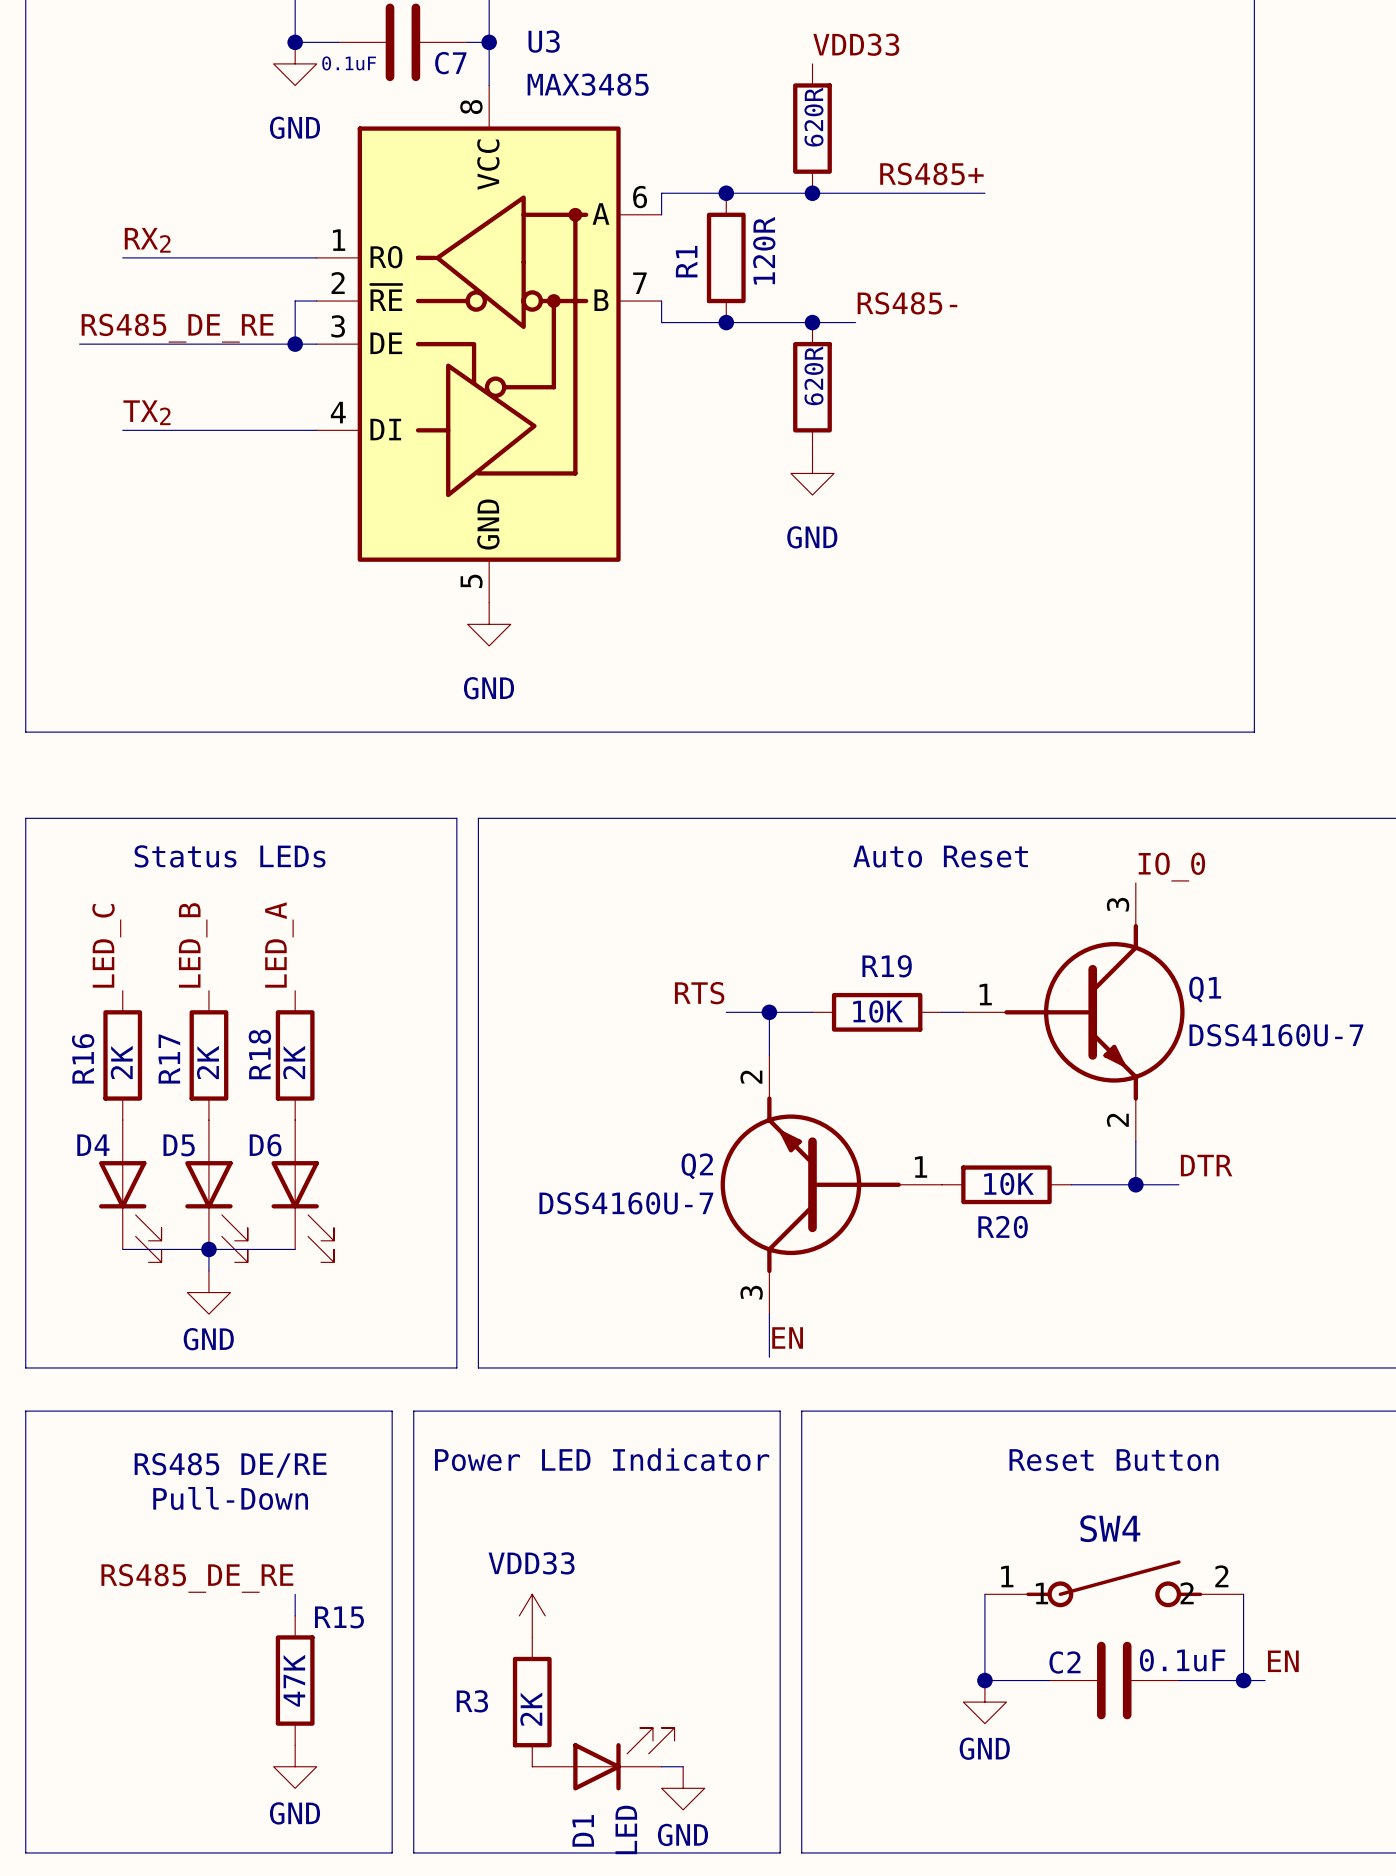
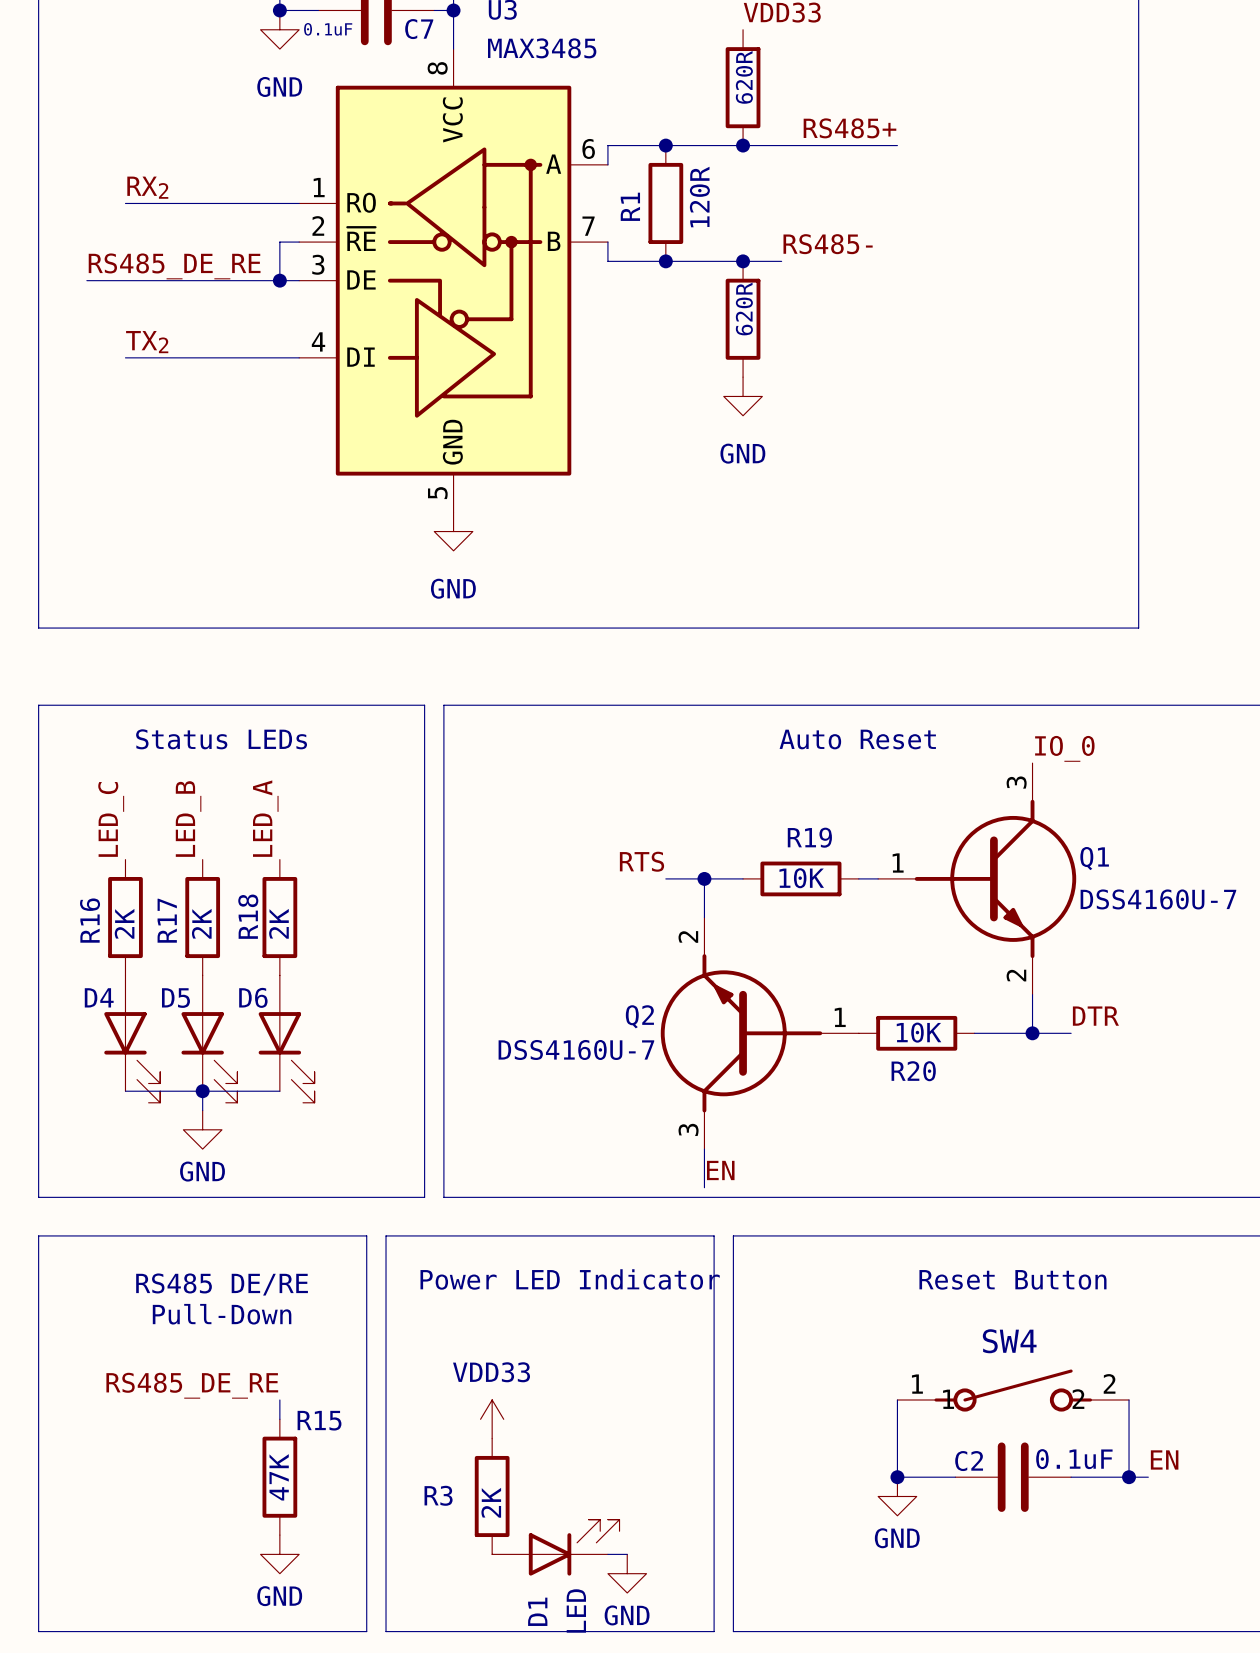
text position: Power LED Indicator (602, 1459) -> Power LED Indicator (570, 1279)

